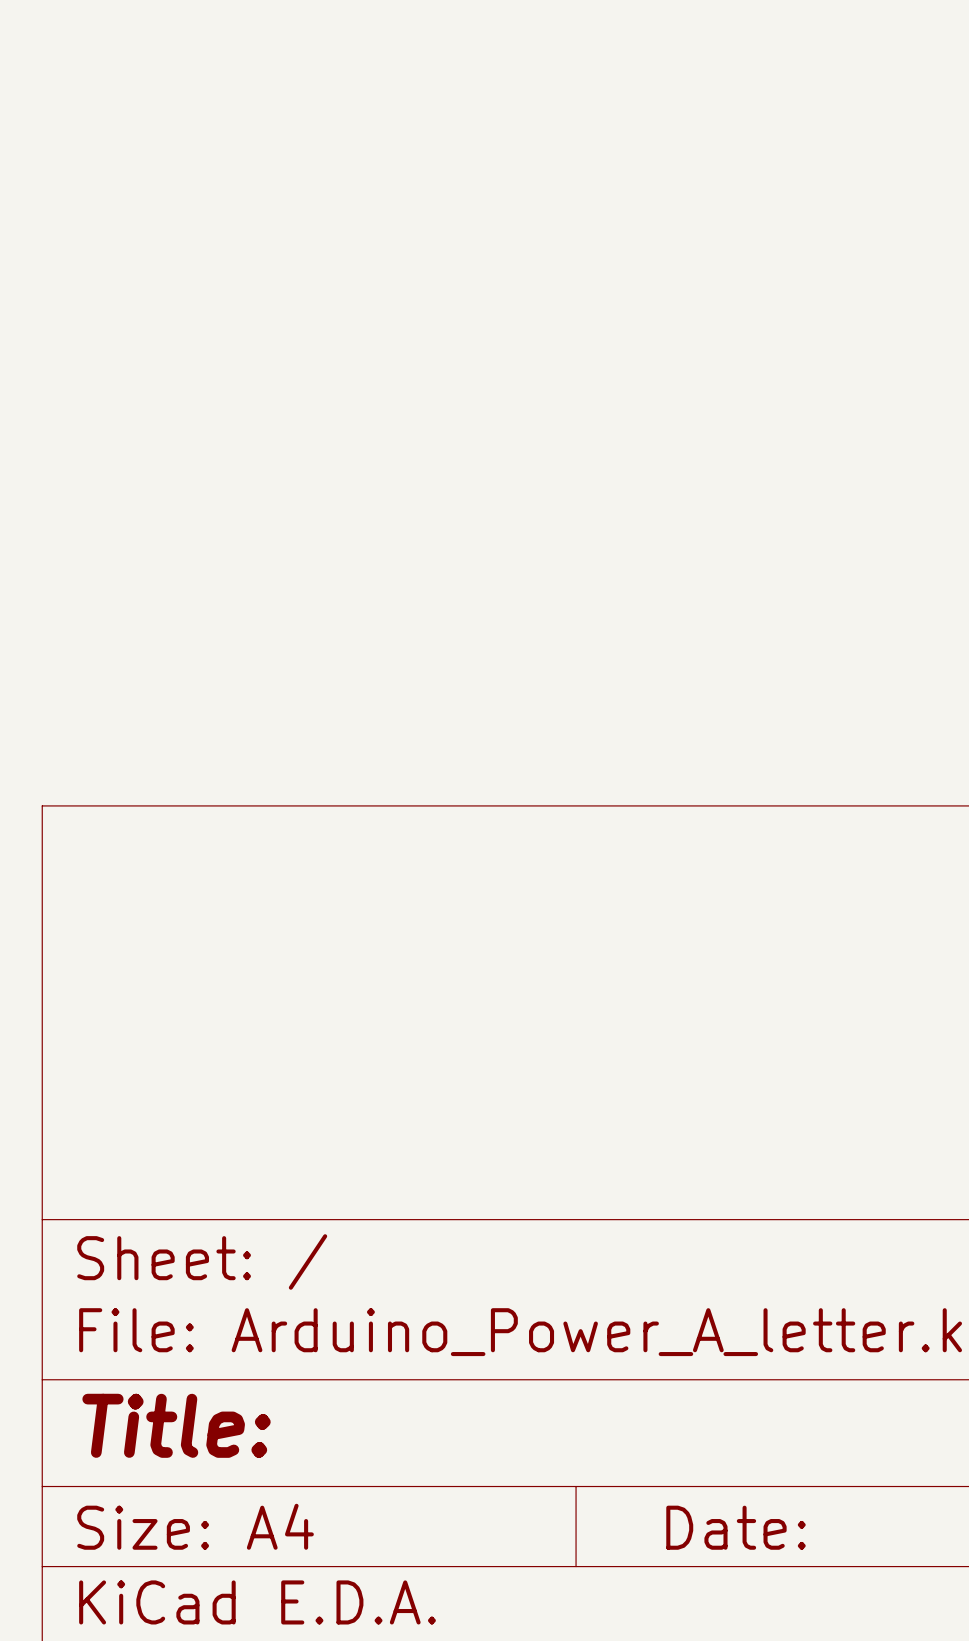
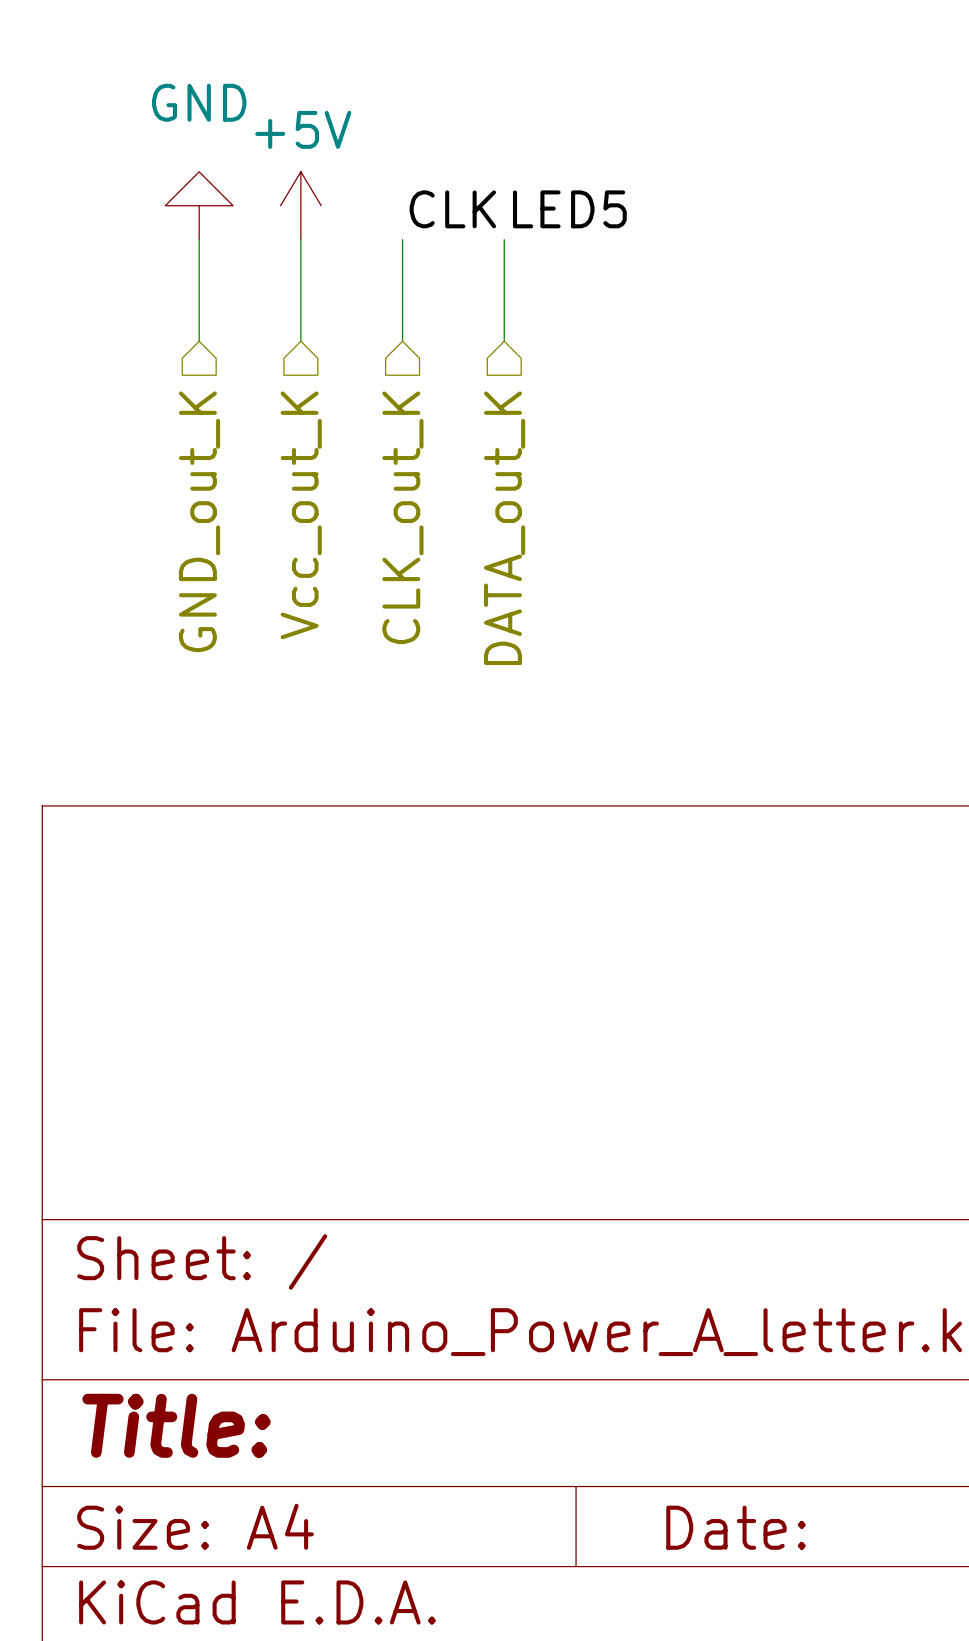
power symbol: none -> GND (199, 205)
power symbol: none -> +5V (300, 205)
label: none -> CLK (452, 209)
label: none -> LED5 (569, 209)
wire: none -> (199, 239) (199, 341)
wire: none -> (300, 239) (300, 341)
wire: none -> (402, 239) (402, 341)
wire: none -> (504, 239) (504, 341)
hierarchical label: none -> Vcc_out_K (301, 515)
hierarchical label: none -> CLK_out_K (402, 517)
hierarchical label: none -> GND_out_K (199, 521)
hierarchical label: none -> DATA_out_K (504, 528)

